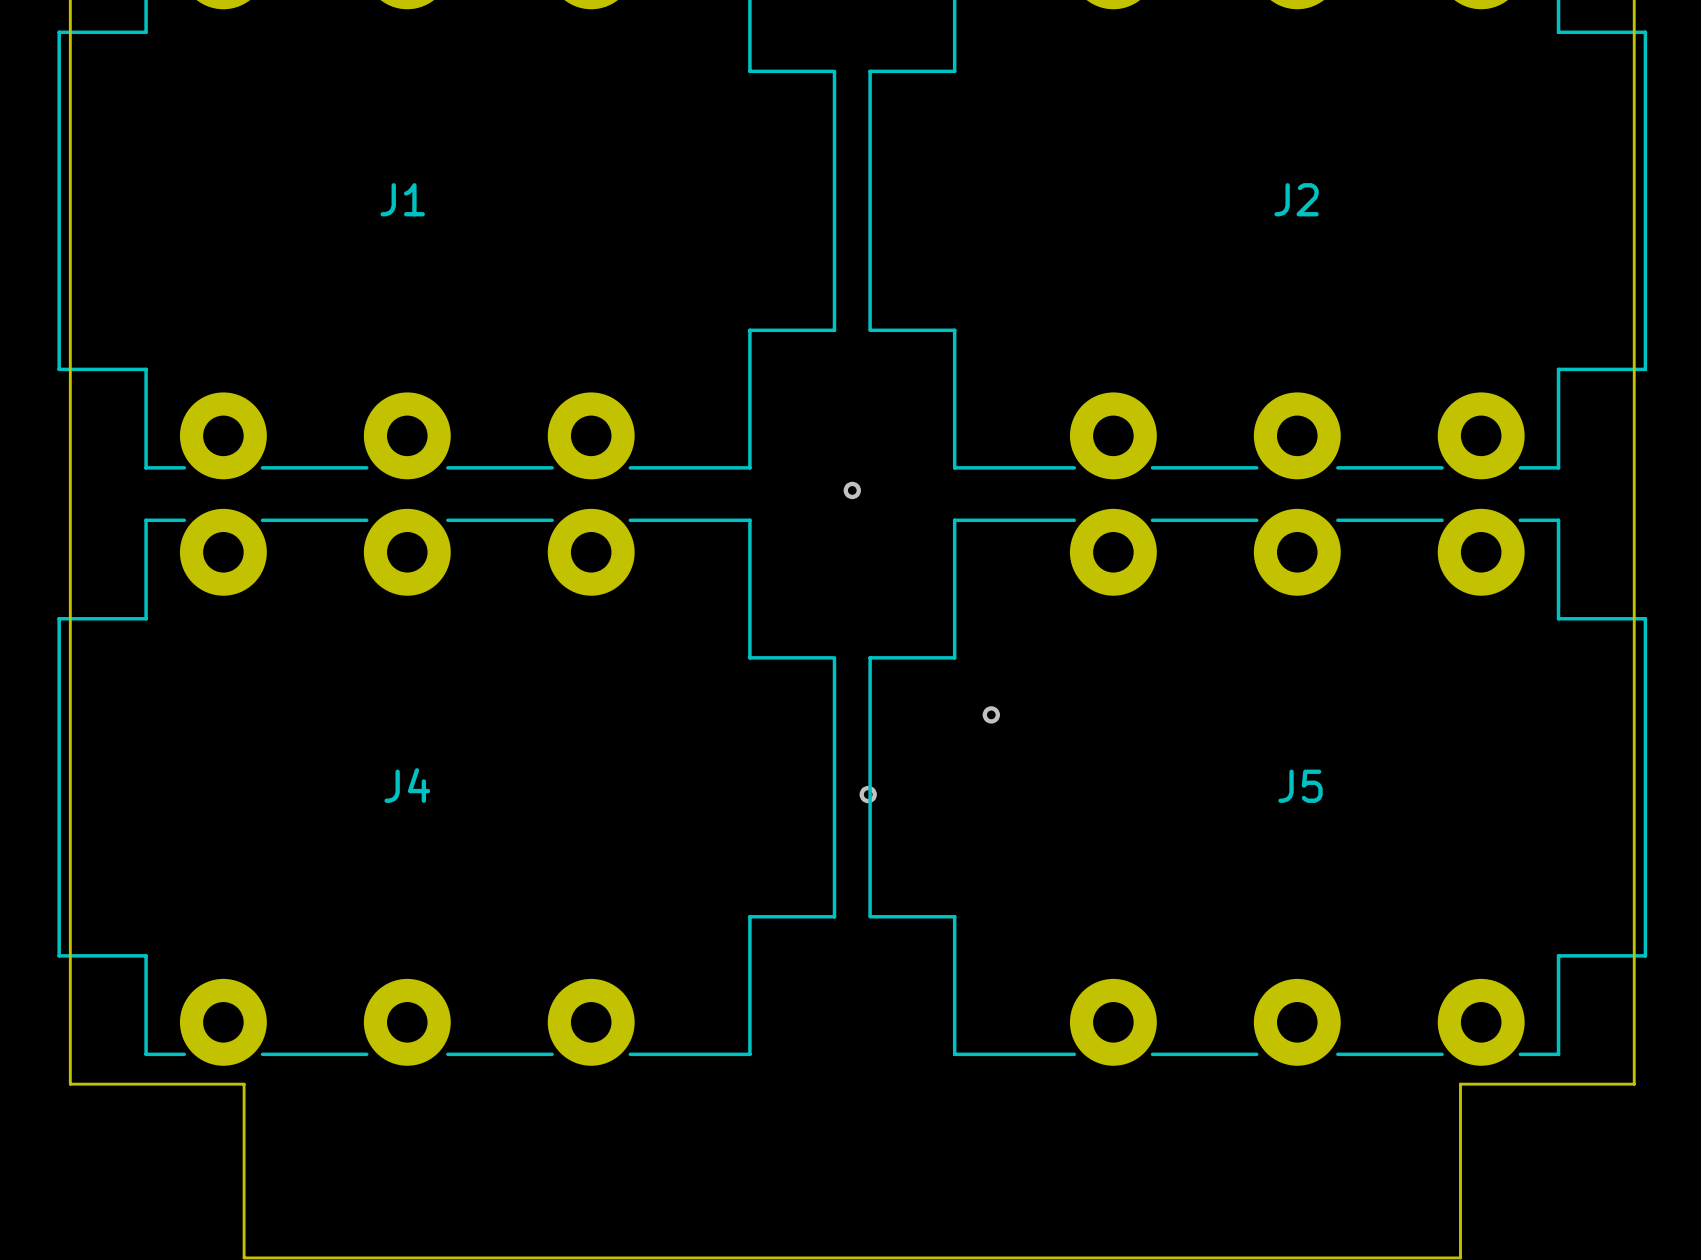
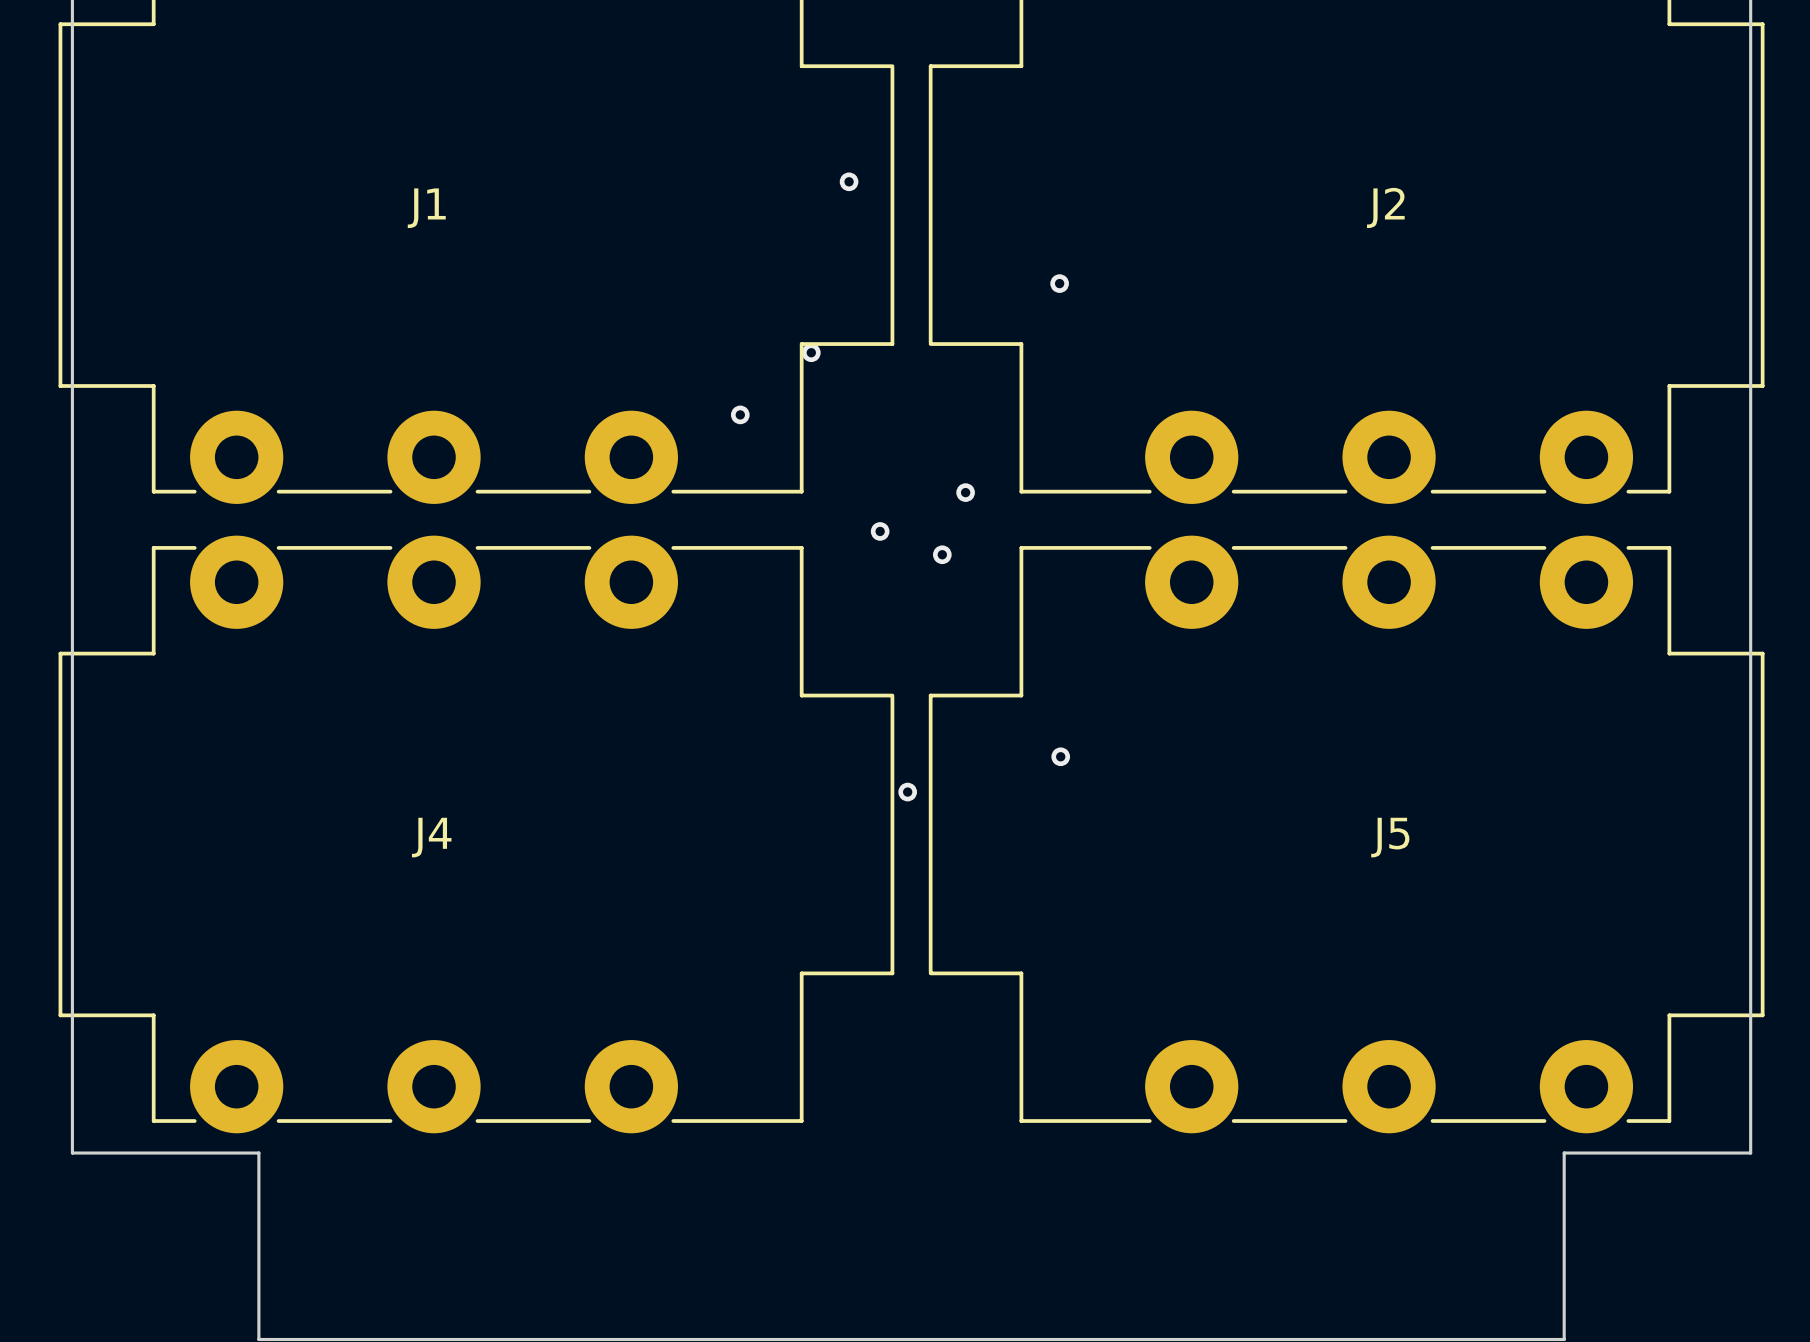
via: none -> (849, 181)
via: none -> (1059, 283)
via: none -> (811, 352)
via: none -> (740, 414)
via: none -> (965, 492)
via: (852, 490) -> none
via: none -> (880, 531)
via: none -> (942, 554)
via position: (868, 794) -> (907, 792)

